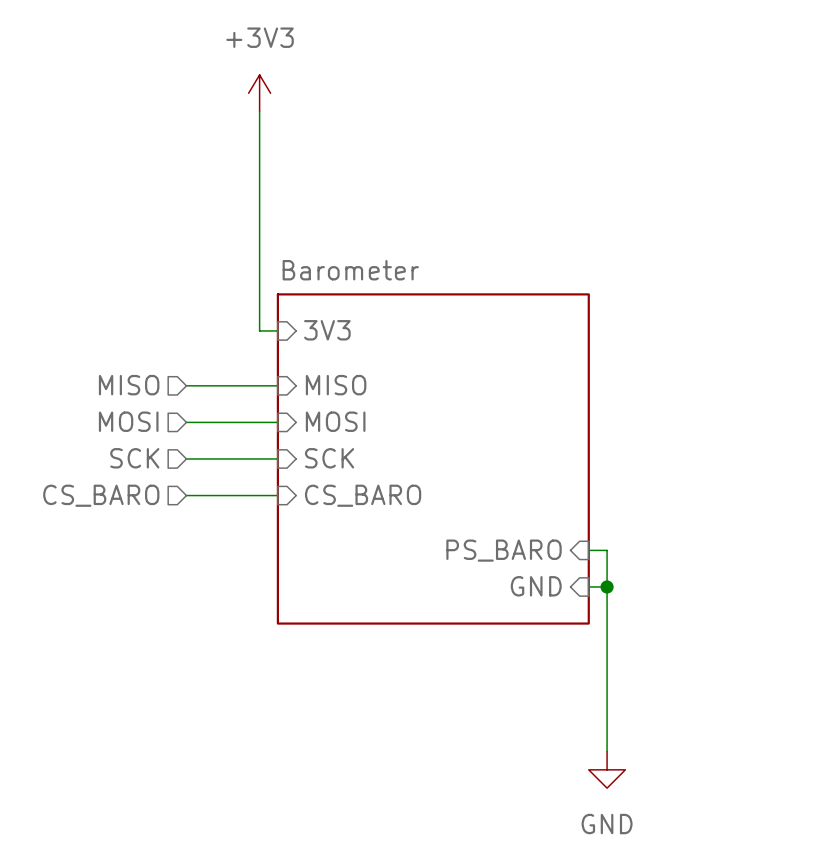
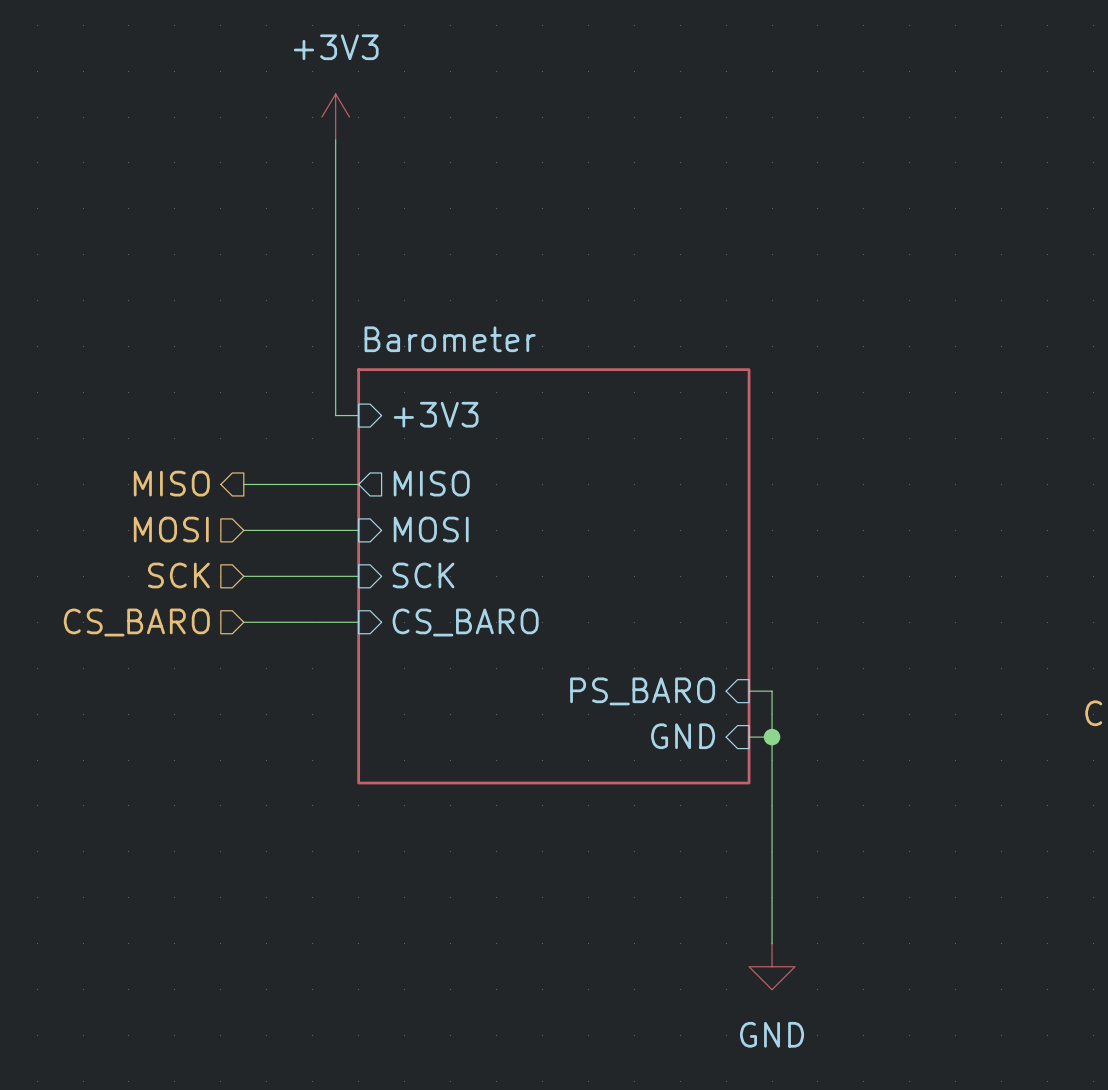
sheet pin: 3V3 (327, 330) -> +3V3 (436, 414)
hierarchical label shape: input (129, 385) -> output (171, 483)
sheet pin shape: input (336, 385) -> output (431, 483)

